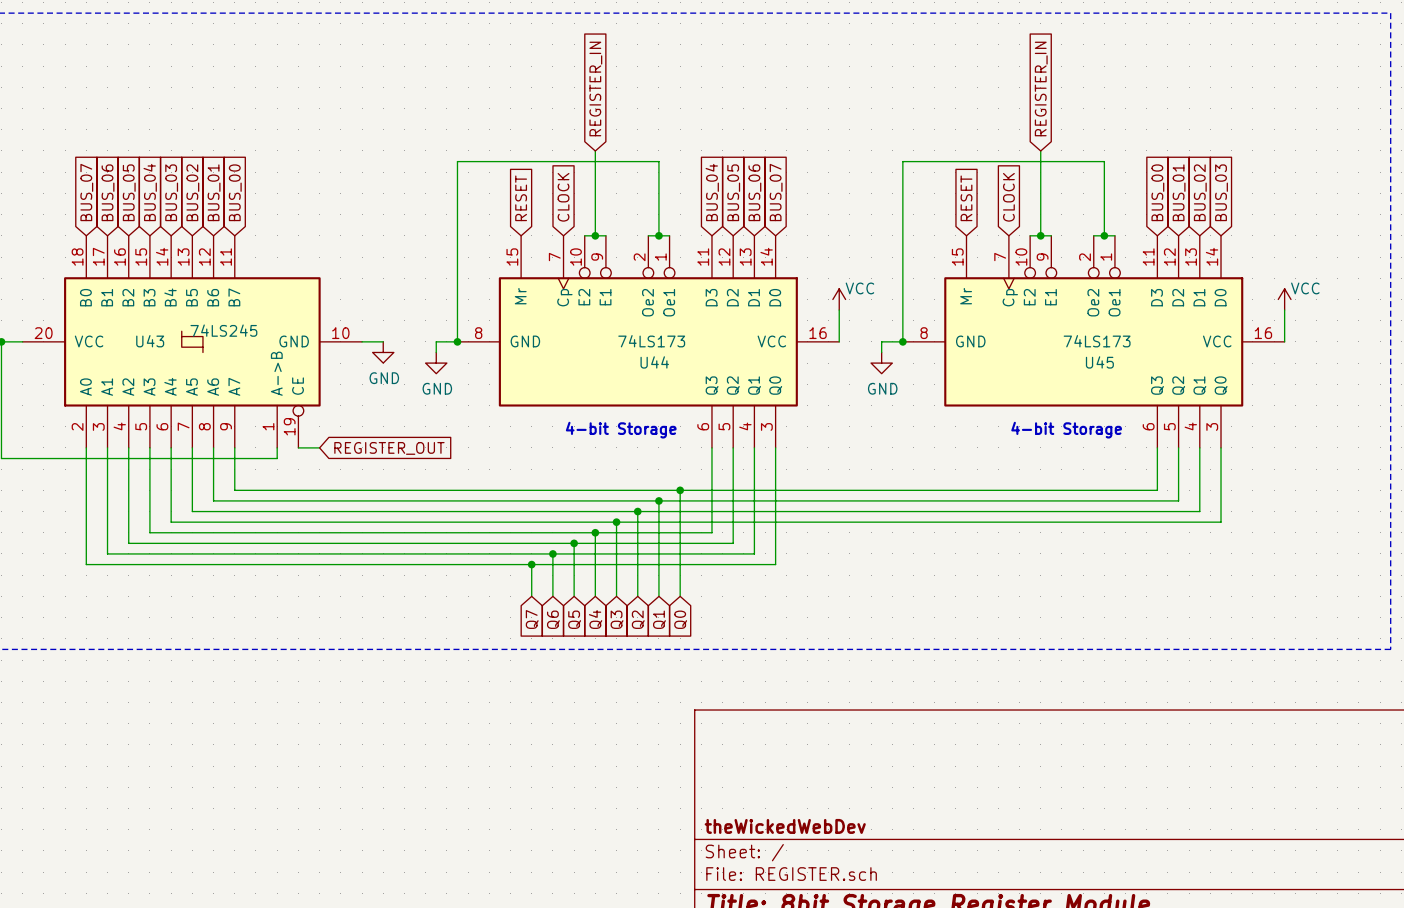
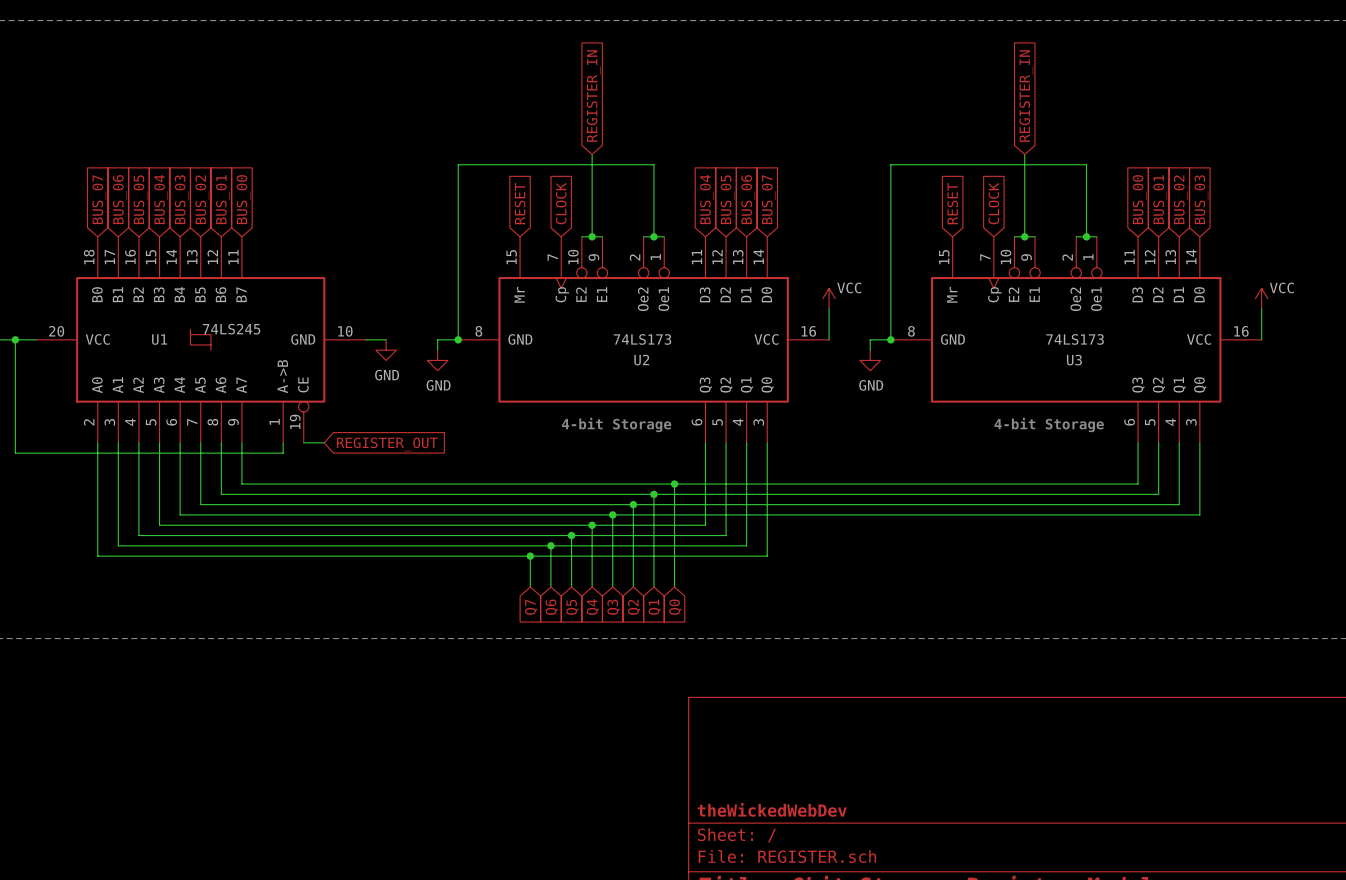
U43 name: U43 (150, 341) -> U1 (159, 339)
U44 name: U44 (654, 362) -> U2 (641, 360)
U45 name: U45 (1099, 362) -> U3 (1074, 360)

